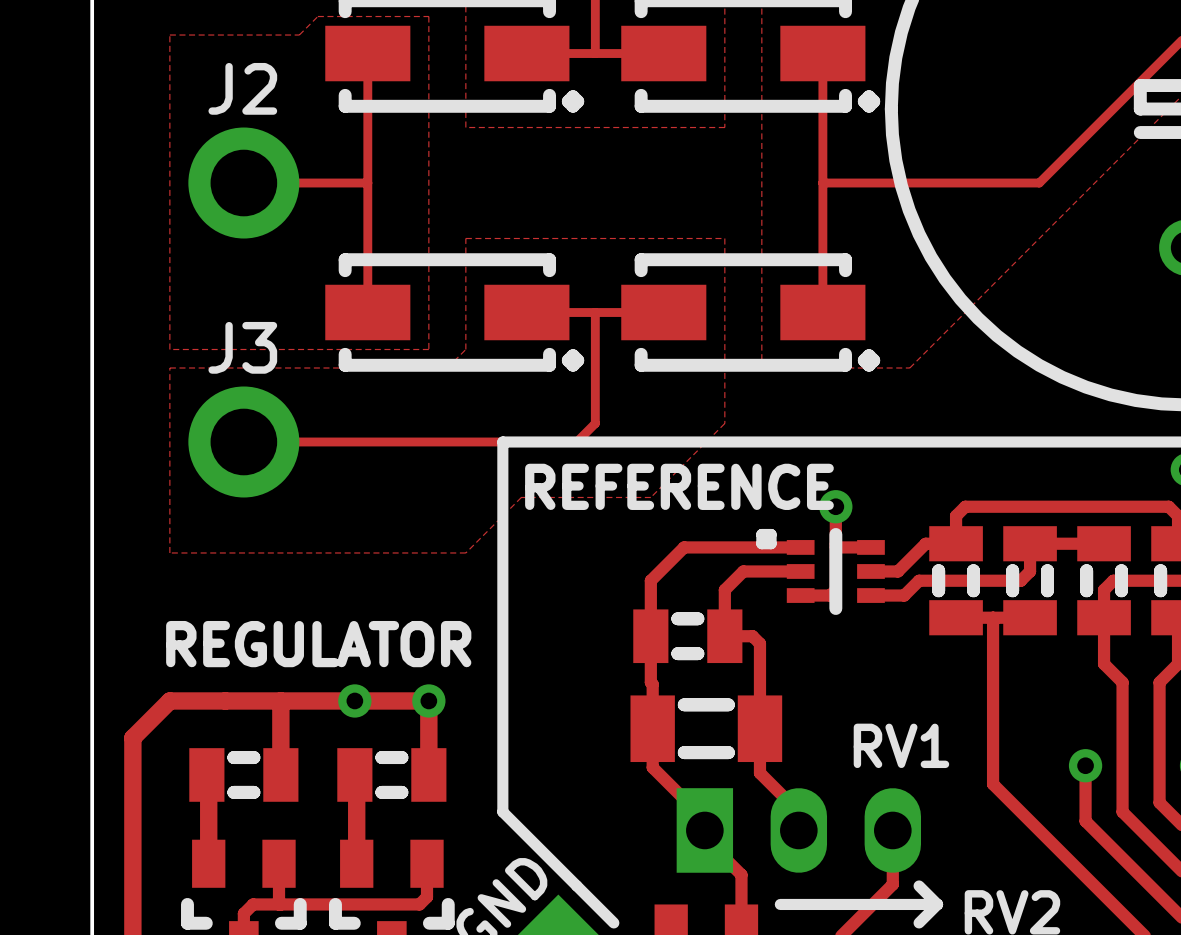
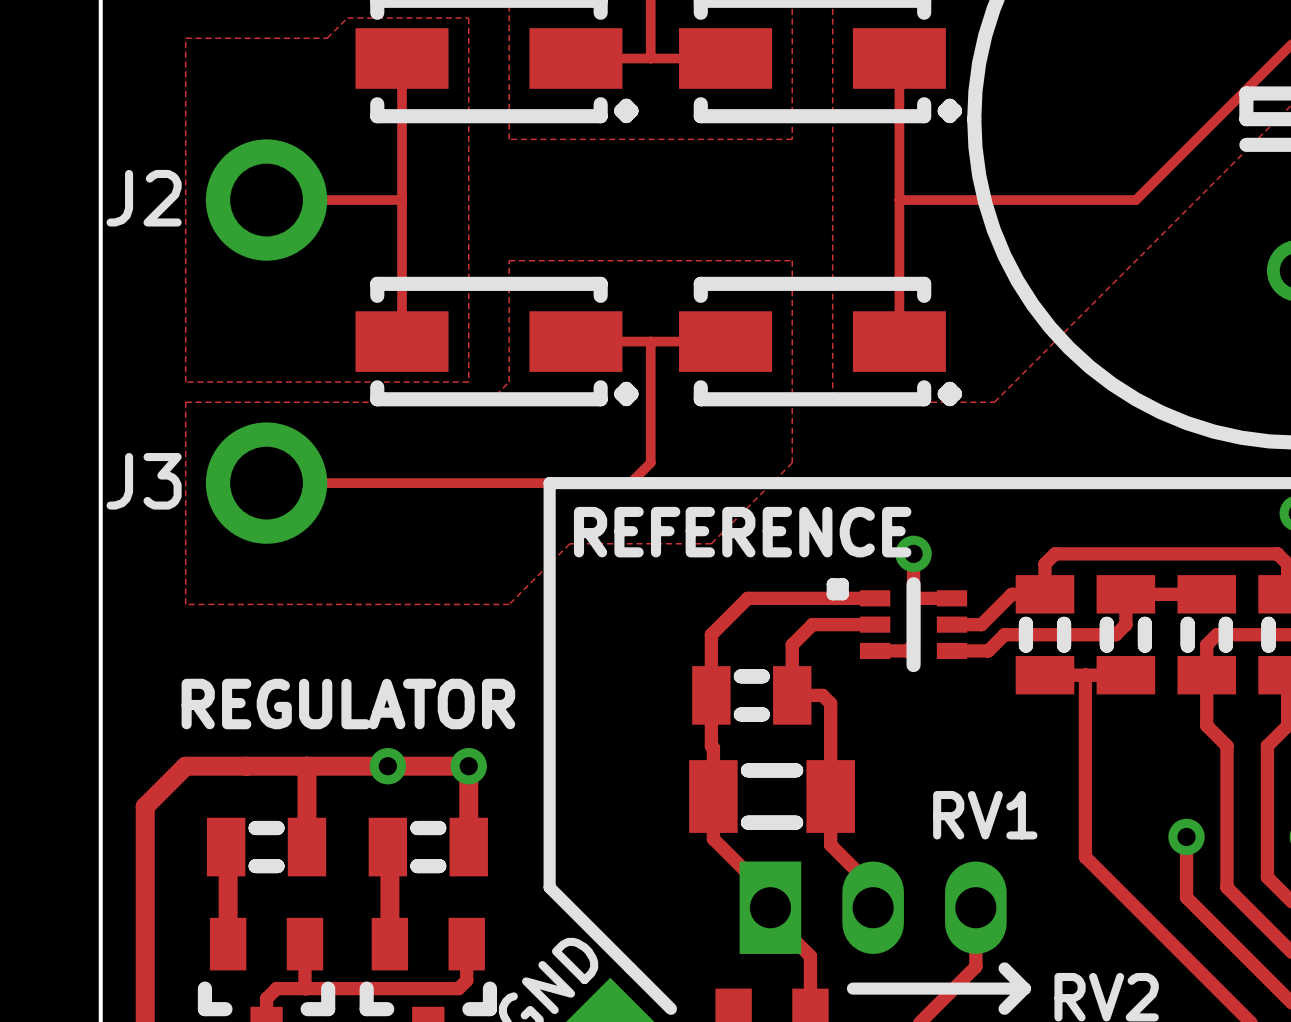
J2 name position: J2 (242, 88) -> J2 (144, 198)
J3 name position: J3 (242, 347) -> J3 (144, 481)

